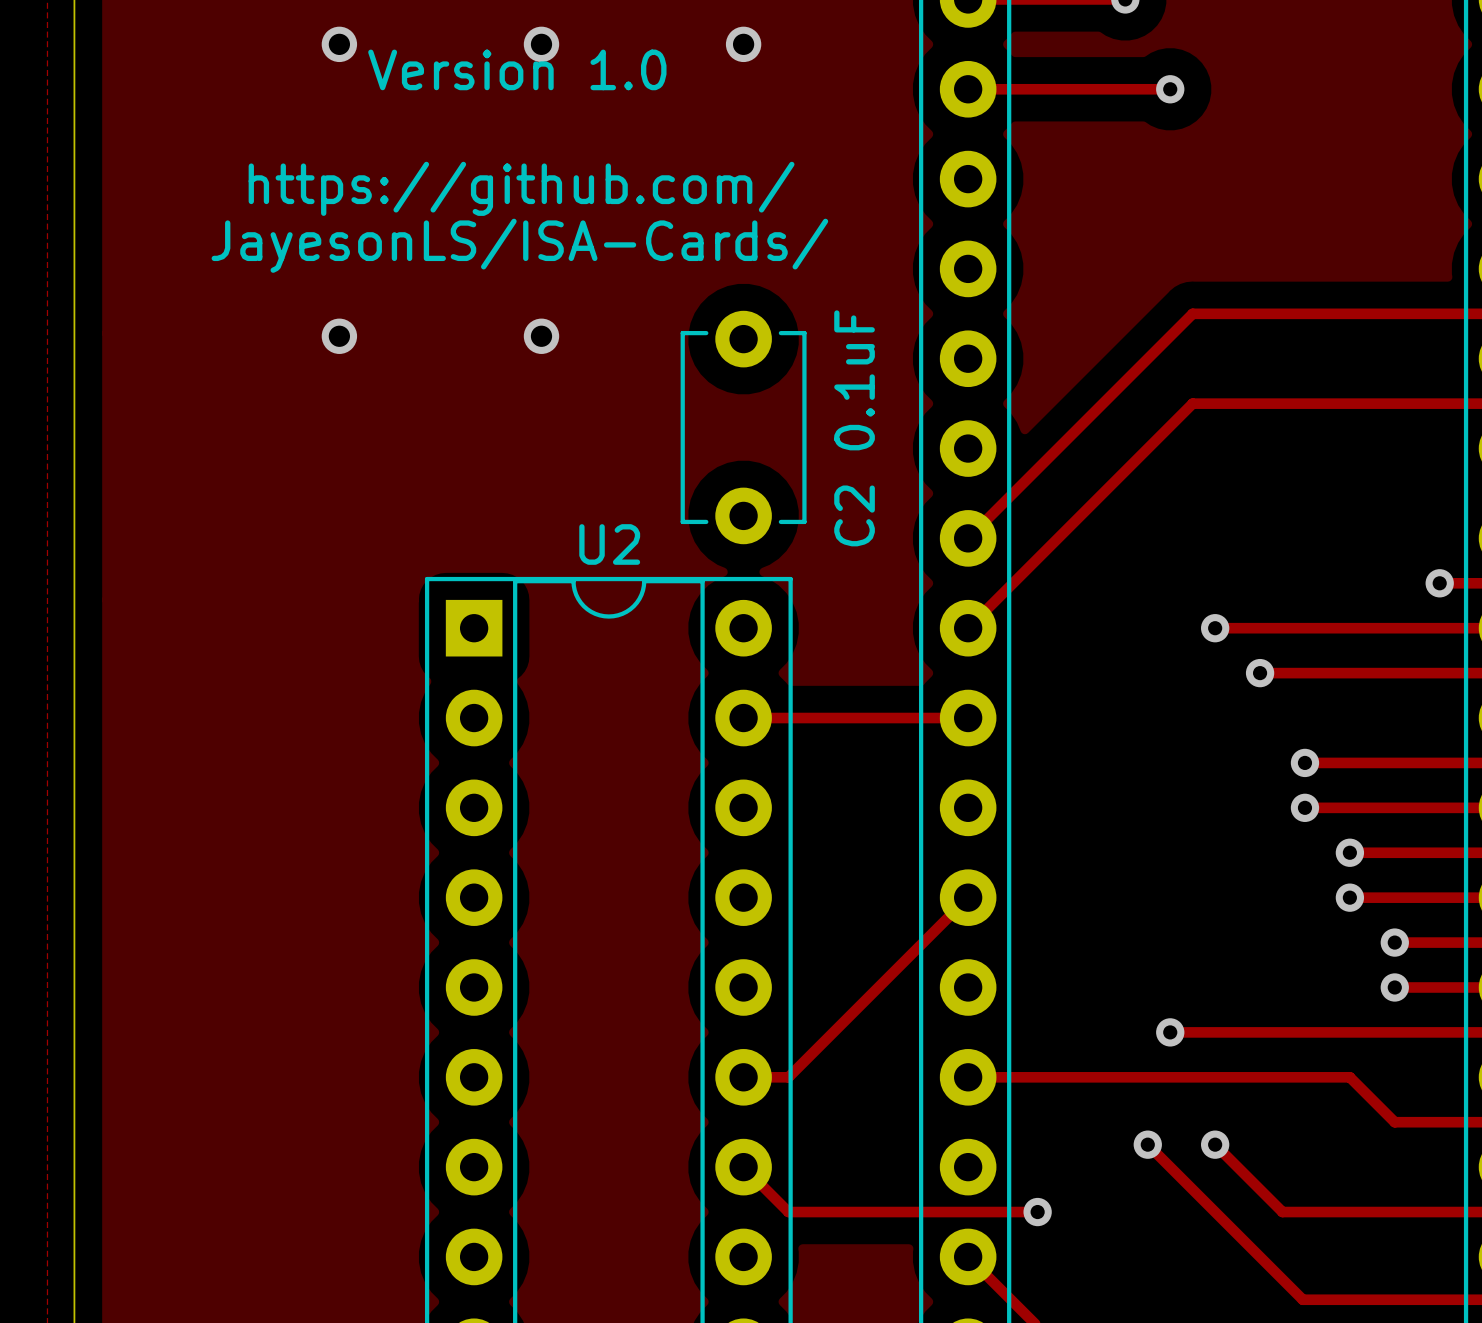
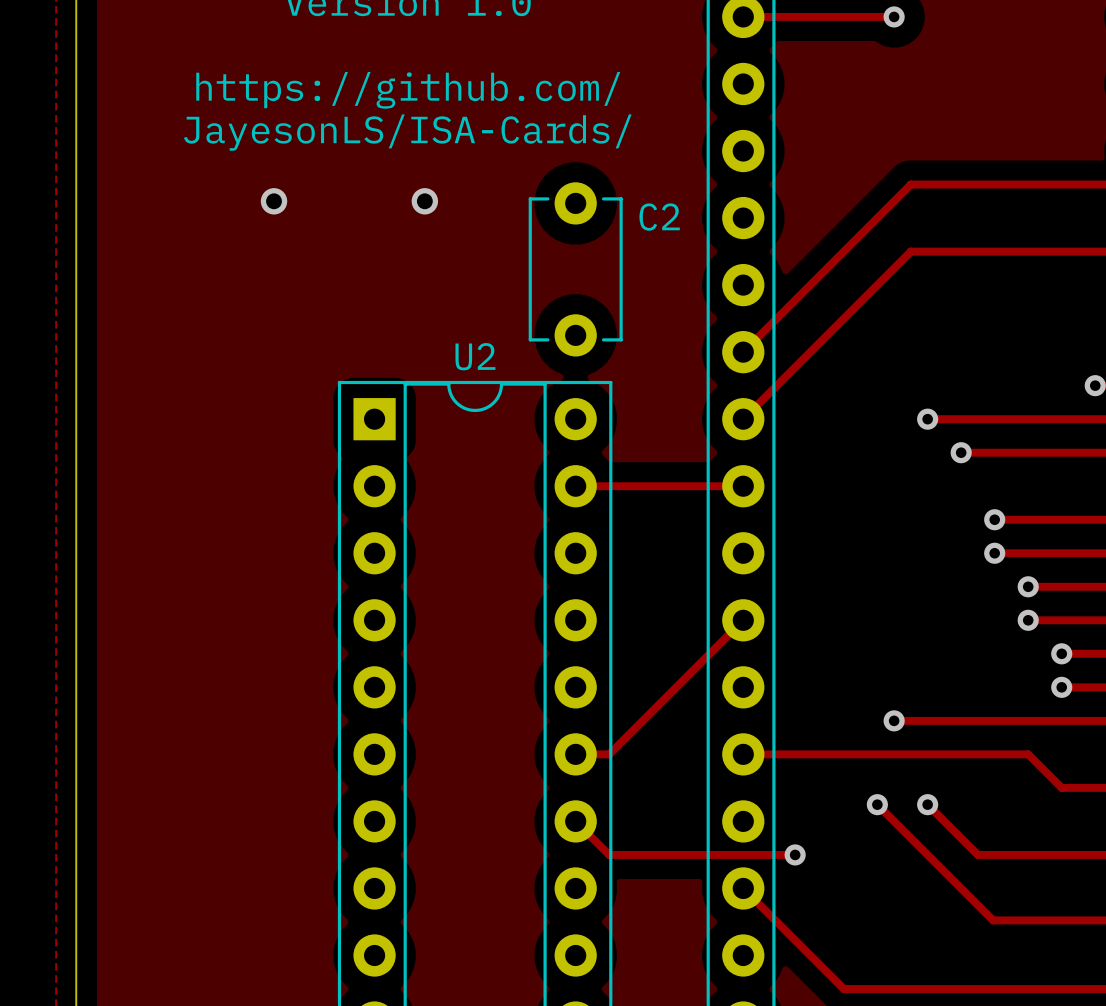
C2 value: 0.1uF (854, 380) -> none
C2 name rotation: 0° (854, 515) -> 90° clockwise (659, 217)
C2 name position: C2 (854, 515) -> C2 (659, 217)

